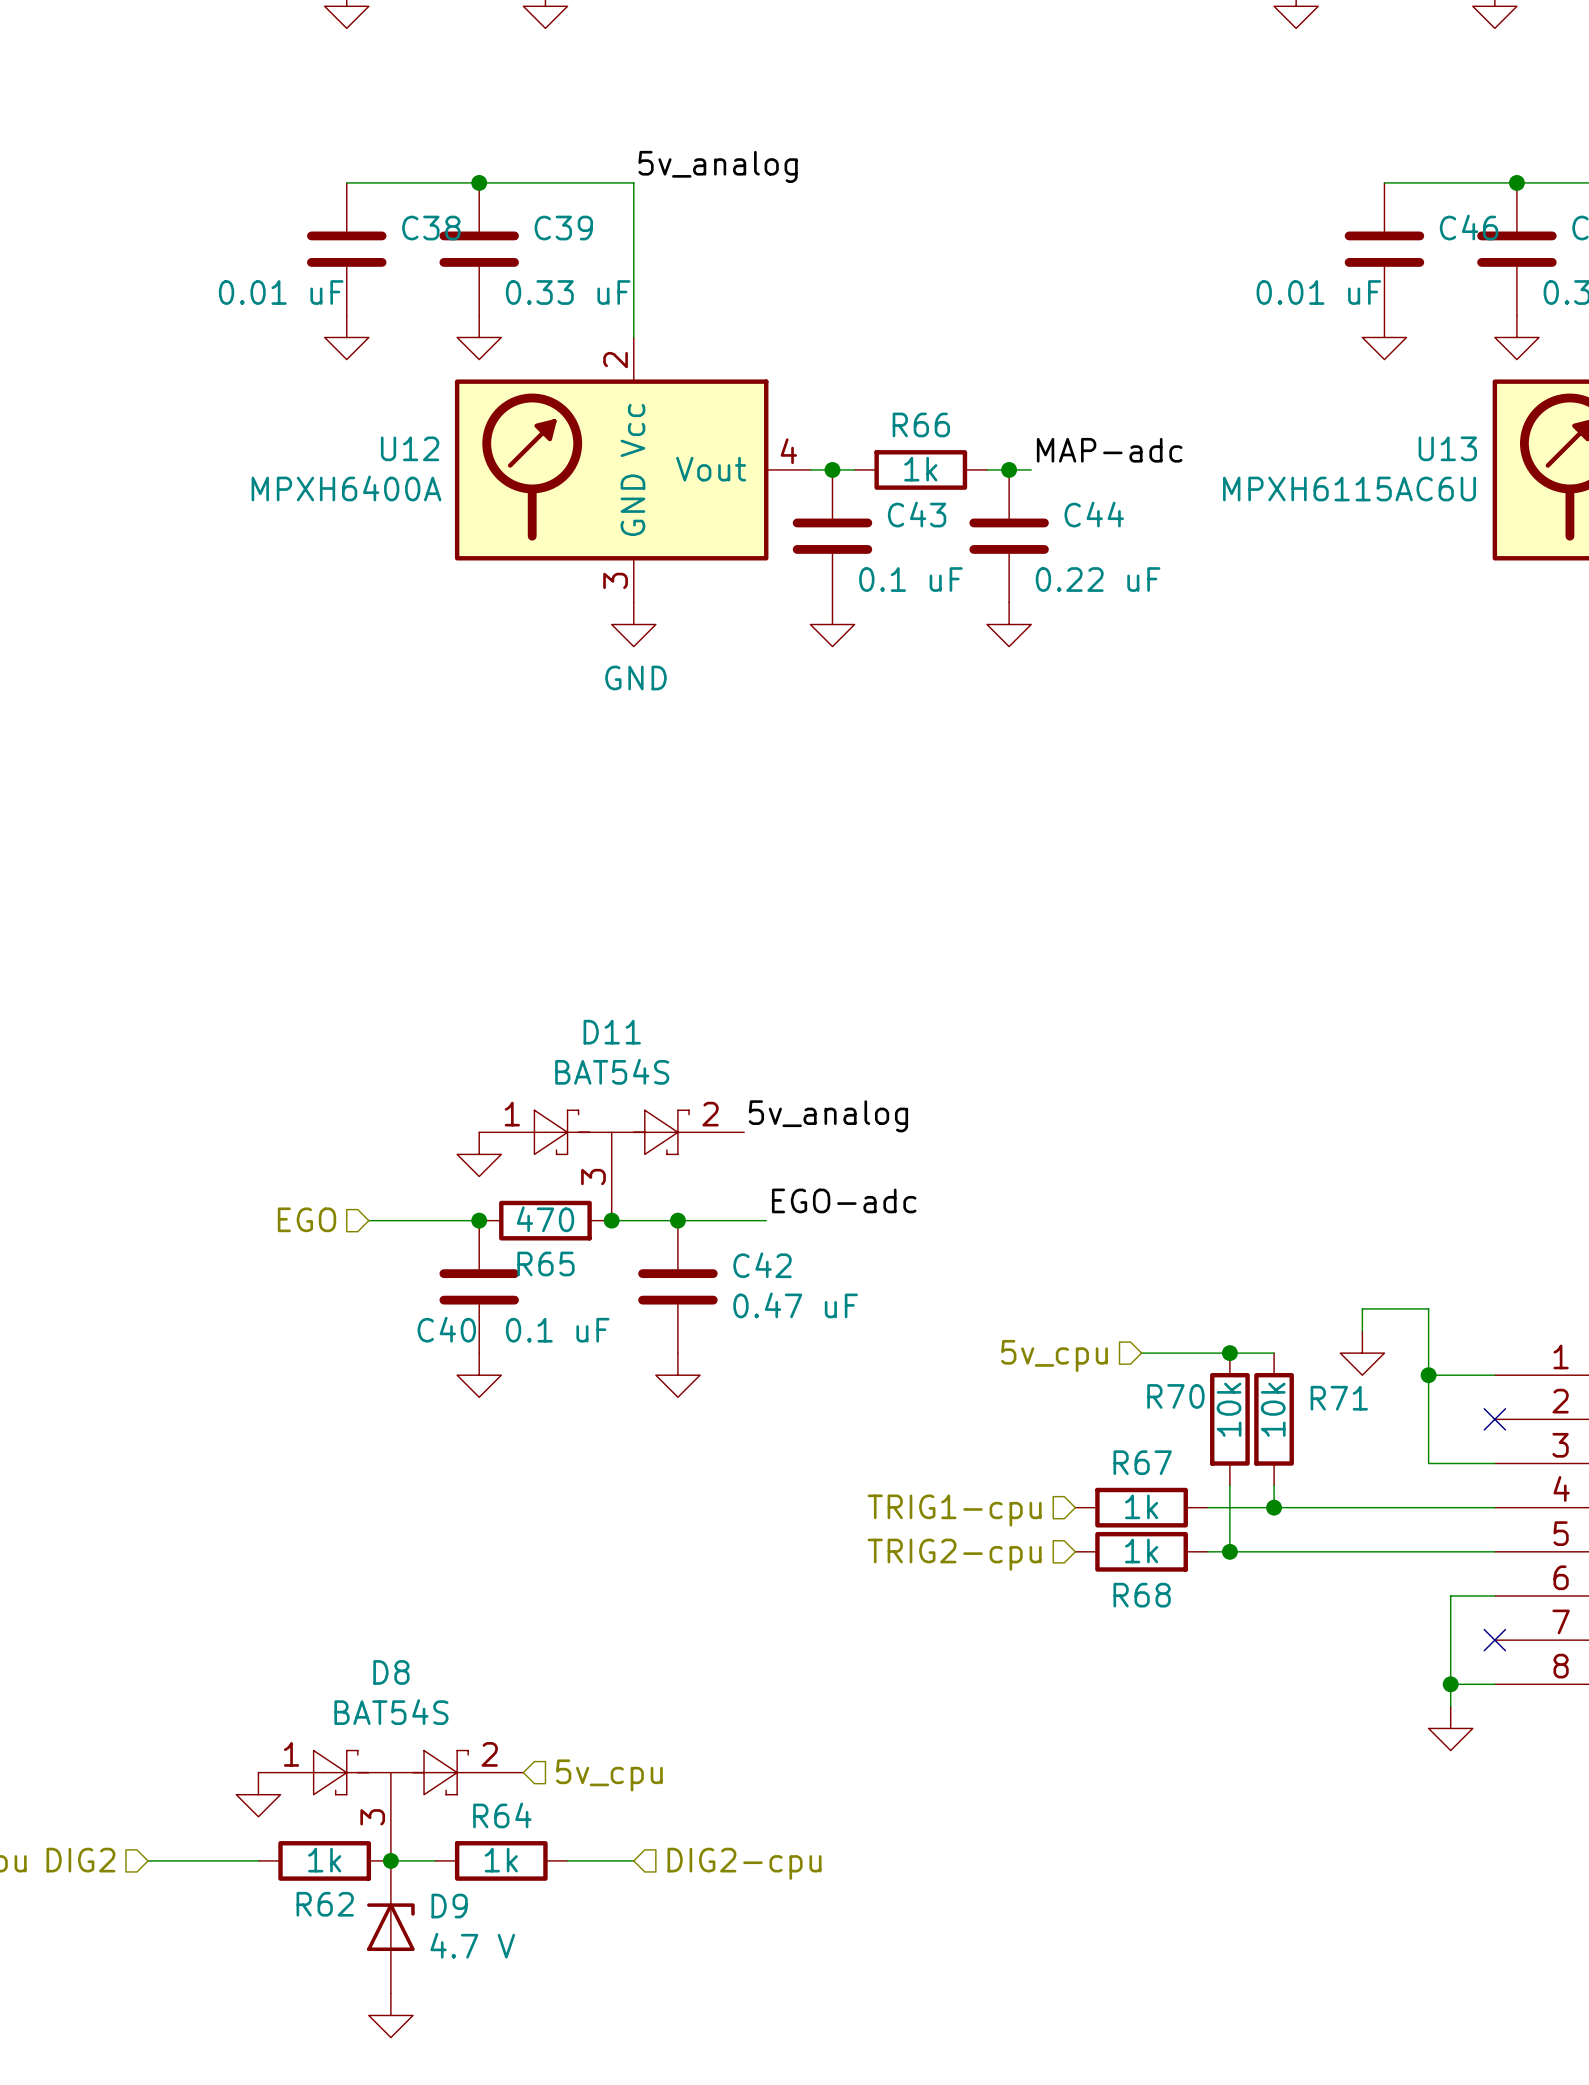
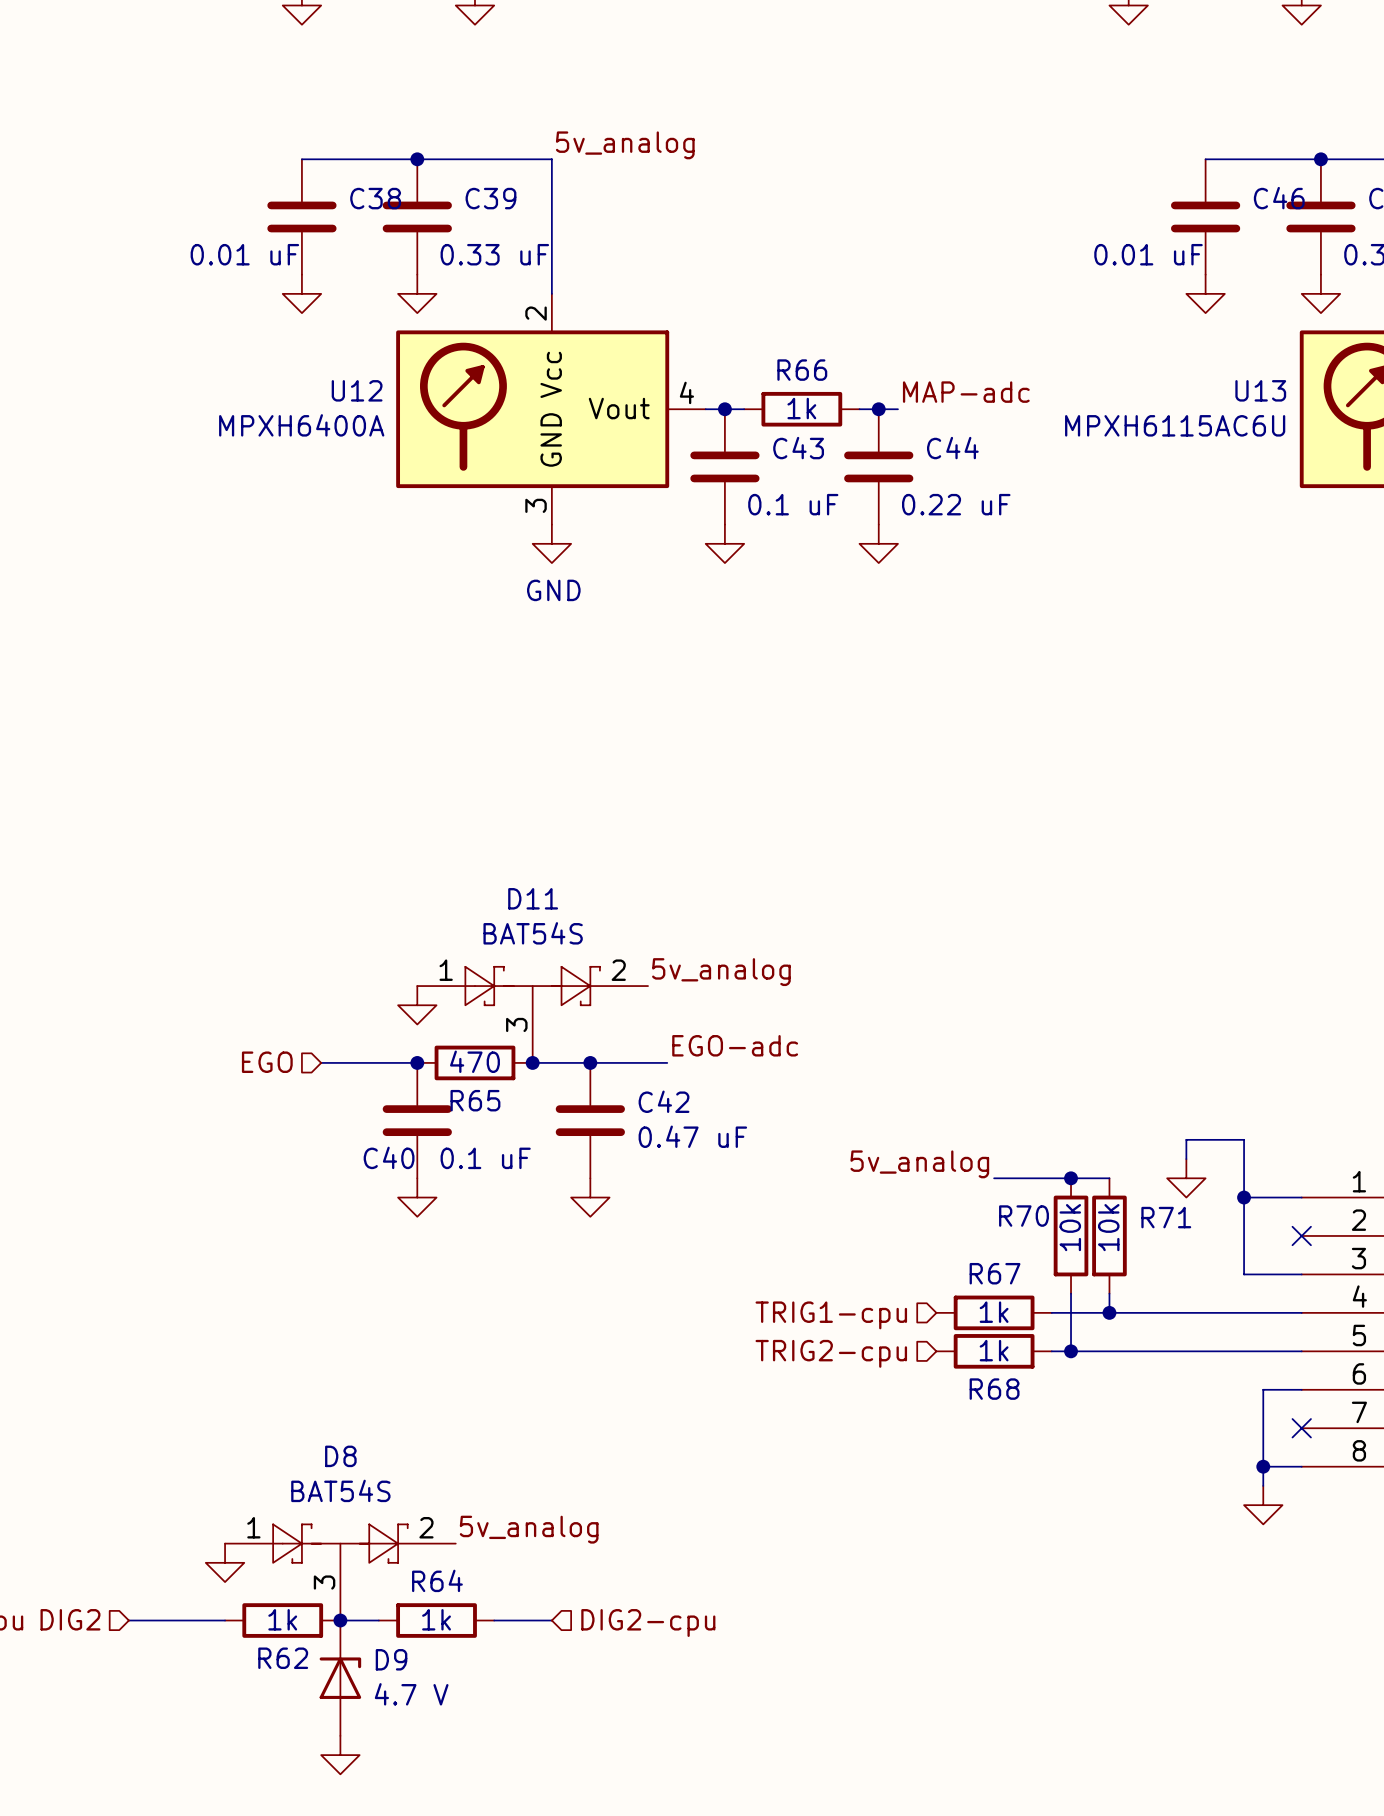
label: none -> 5v_analog (919, 1164)
hierarchical label: 5v_cpu (1054, 1355) -> none
label: none -> 5v_analog (529, 1529)
hierarchical label: 5v_cpu (609, 1775) -> none

